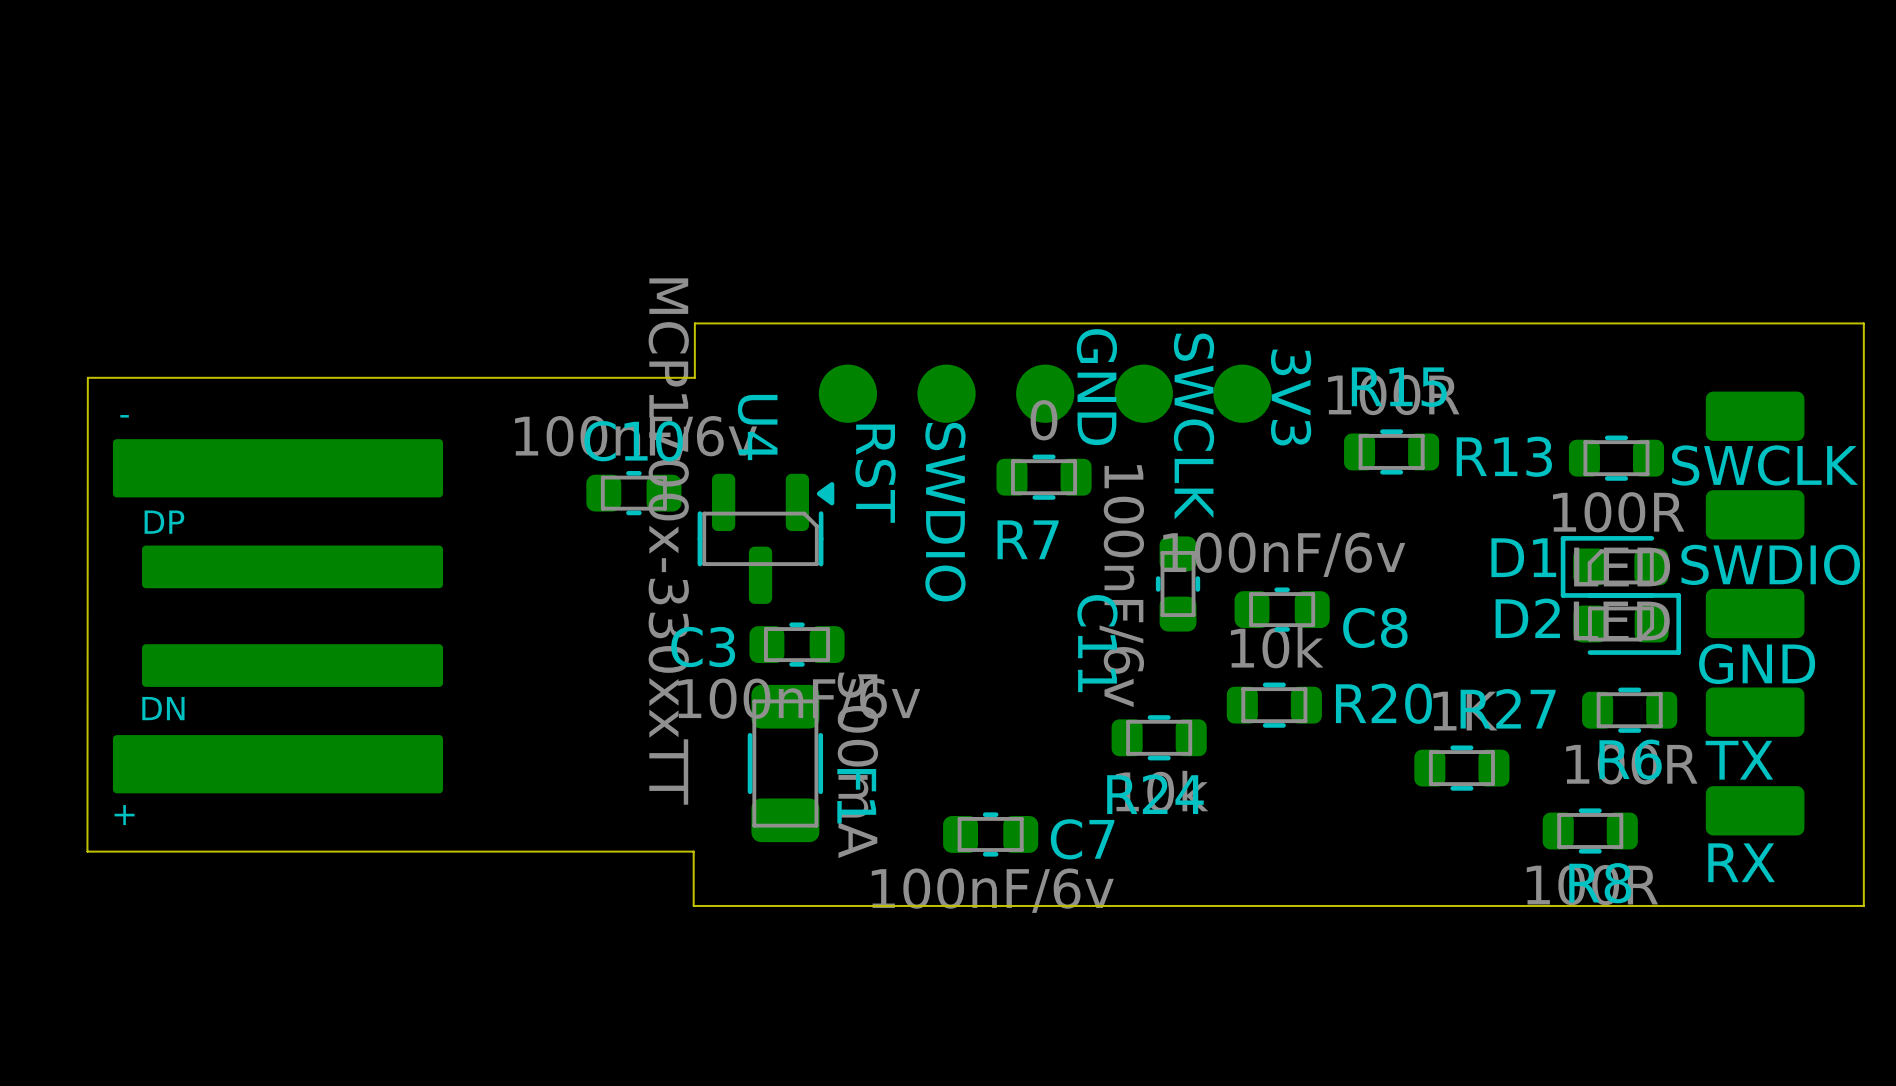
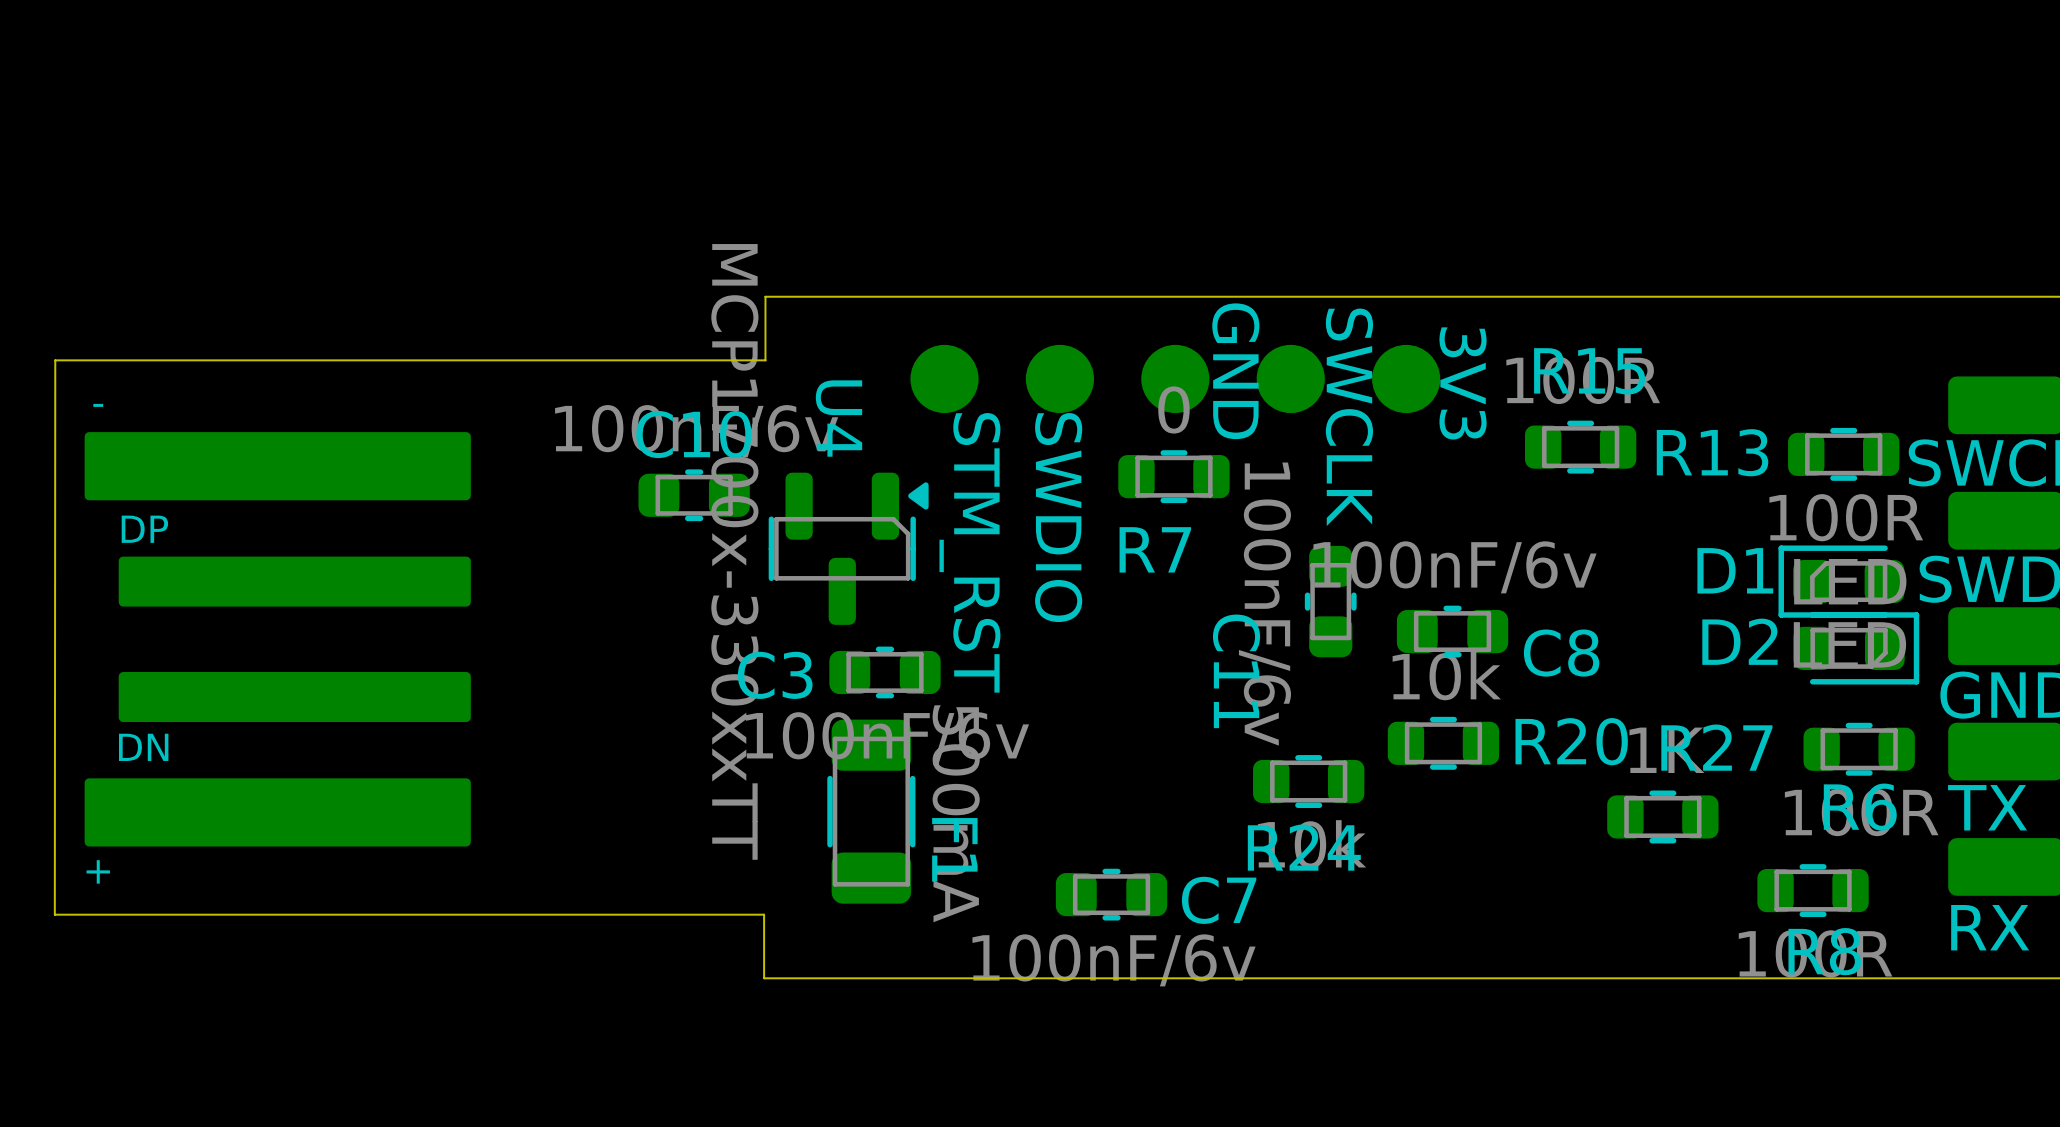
text: RST (875, 473) -> STM_RST (969, 552)

